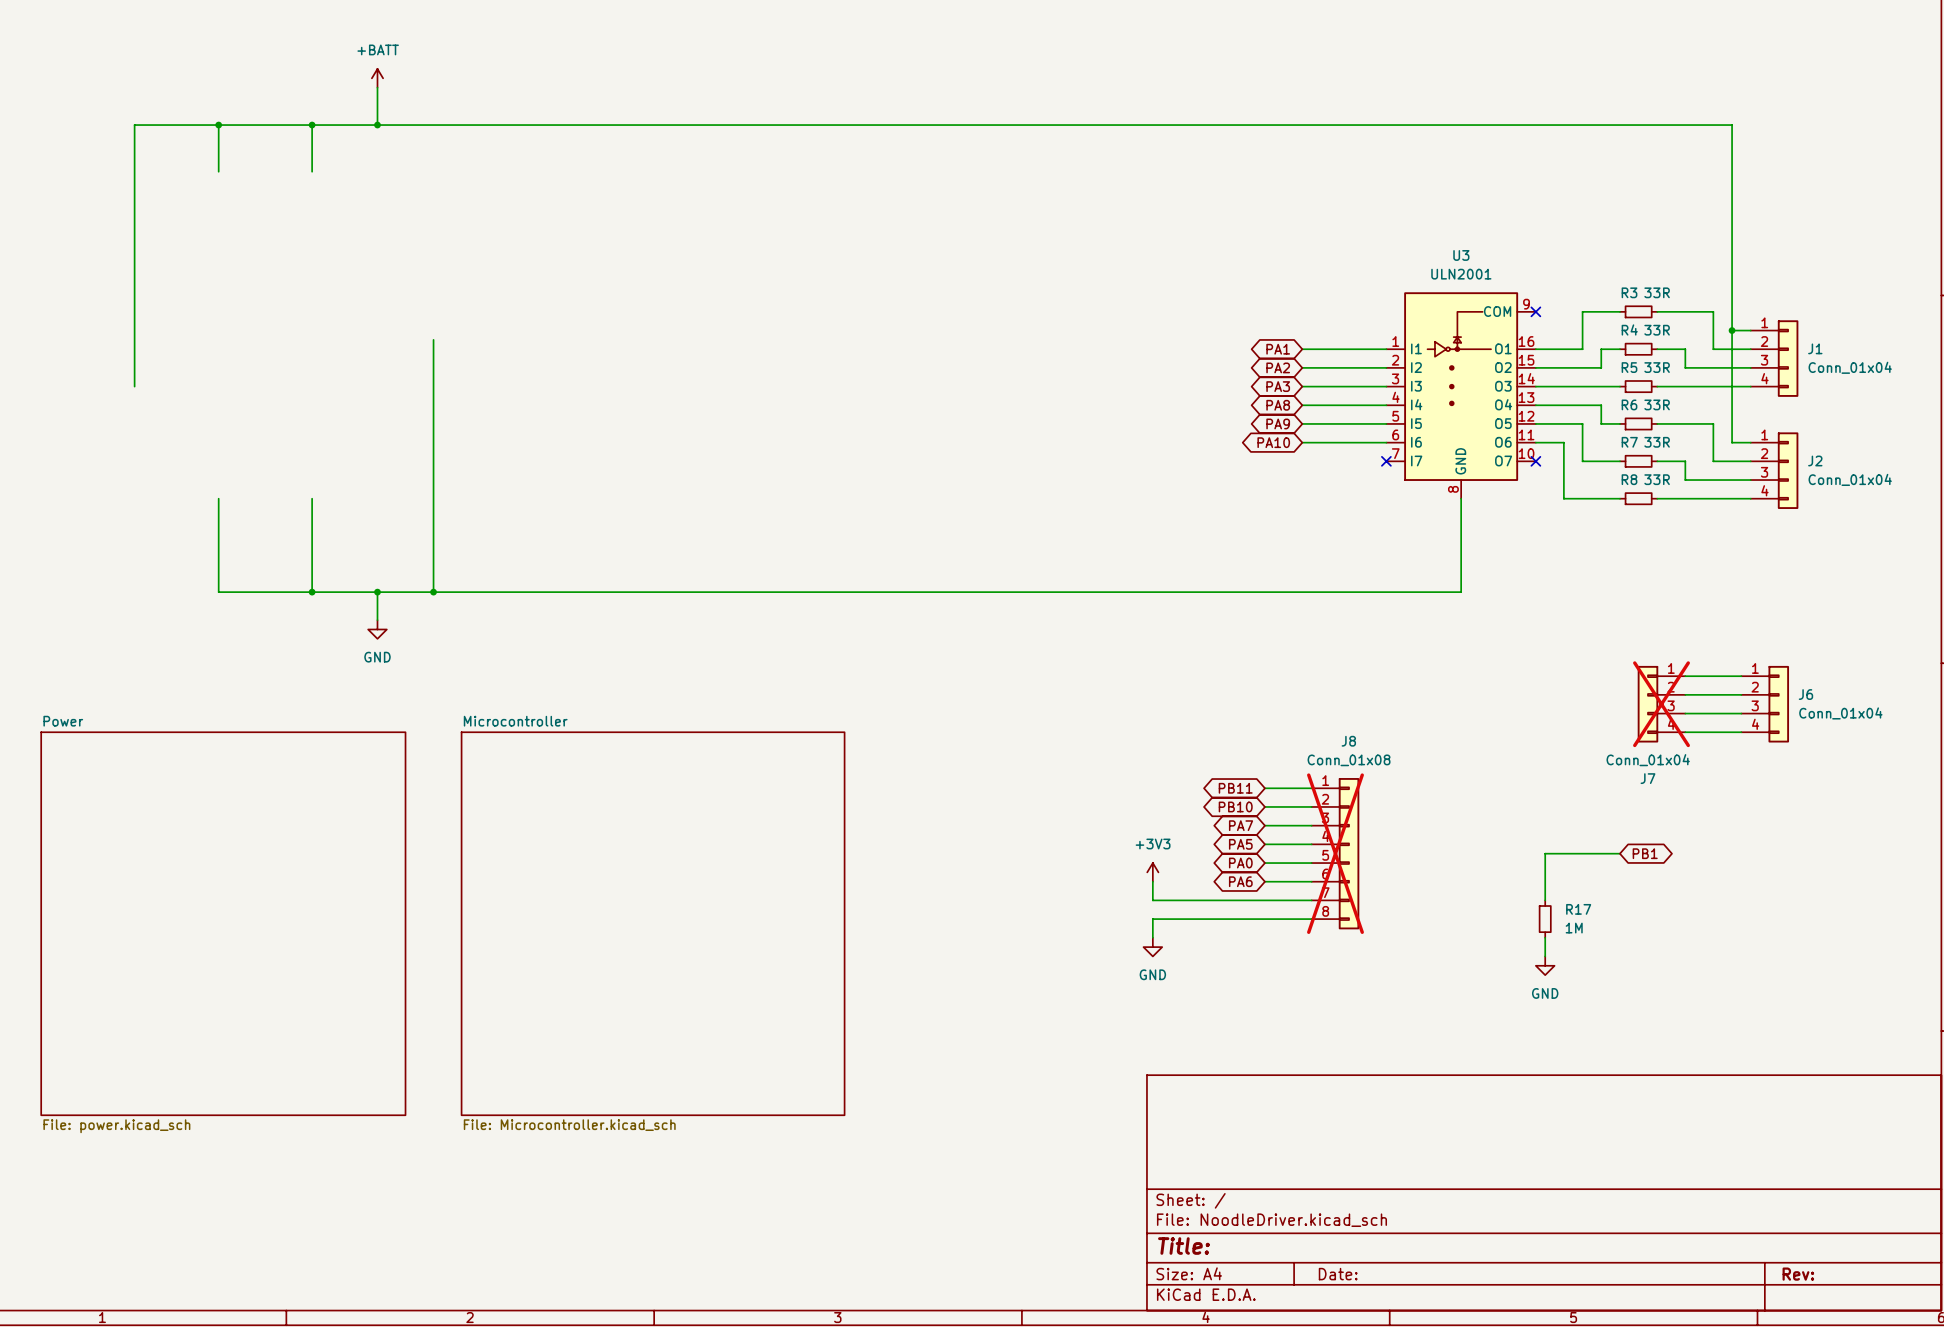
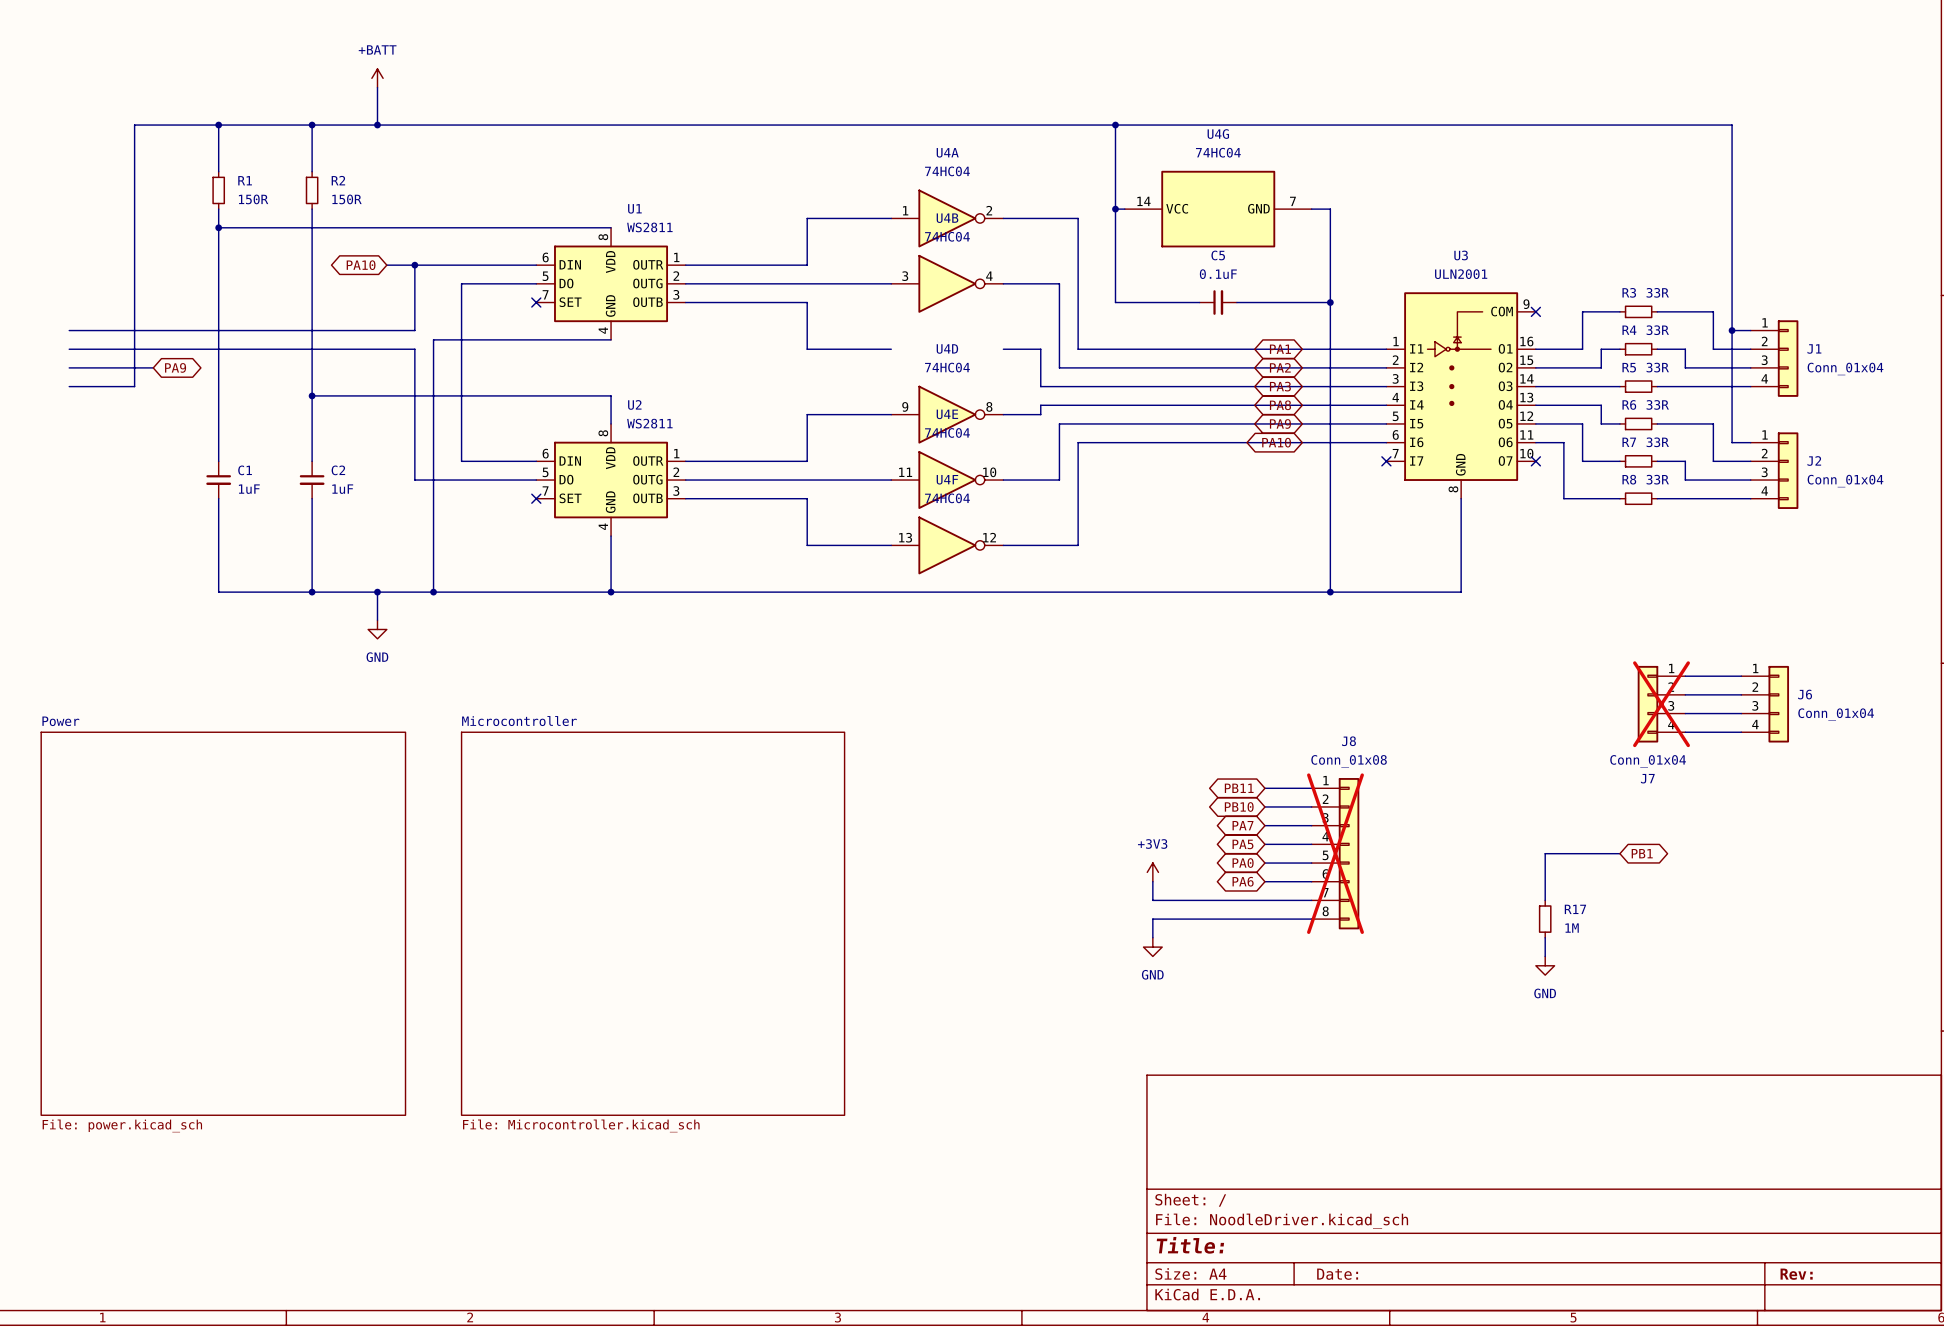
wire: none -> (1115, 125) (1115, 302) (1199, 302)
junction: none -> (1115, 125)
R1: none -> 150R (218, 190)
R2: none -> 150R (312, 190)
wire: none -> (218, 209) (218, 461)
wire: none -> (312, 209) (312, 461)
wire: none -> (1115, 209) (1124, 209)
junction: none -> (1115, 209)
U4G: none -> 74HC04 (1218, 209)
wire: none -> (1311, 209) (1330, 209) (1330, 592)
wire: none -> (891, 218) (807, 218) (807, 265) (685, 265)
U4A: none -> 74HC04 (947, 218)
wire: none -> (1003, 218) (1078, 218) (1078, 349) (1302, 349)
wire: none -> (218, 227) (611, 227)
junction: none -> (218, 227)
global label: none -> PA10 (361, 265)
wire: none -> (386, 265) (536, 265)
wire: none -> (414, 265) (414, 330) (69, 330)
junction: none -> (414, 265)
wire: none -> (536, 283) (461, 283) (461, 461) (536, 461)
U1: none -> WS2811 (611, 283)
wire: none -> (685, 283) (891, 283)
U4B: none -> 74HC04 (947, 283)
wire: none -> (1003, 283) (1059, 283) (1059, 367) (1302, 367)
no-connect mark: none -> (536, 302)
wire: none -> (685, 302) (807, 302) (807, 349) (891, 349)
C5: none -> 0.1uF (1218, 302)
wire: none -> (1236, 302) (1330, 302)
junction: none -> (1330, 302)
wire: none -> (433, 339) (611, 339)
wire: none -> (69, 349) (414, 349) (414, 480) (536, 480)
wire: none -> (1003, 349) (1040, 349) (1040, 386) (1302, 386)
wire: none -> (69, 367) (153, 367)
global label: none -> PA9 (175, 367)
wire: none -> (69, 386) (134, 386)
wire: none -> (312, 395) (611, 395) (611, 423)
junction: none -> (312, 395)
wire: none -> (1302, 405) (1040, 405) (1040, 414) (1003, 414)
wire: none -> (891, 414) (807, 414) (807, 461) (685, 461)
U4D: none -> 74HC04 (947, 414)
wire: none -> (1302, 423) (1059, 423) (1059, 480) (1003, 480)
wire: none -> (1302, 442) (1078, 442) (1078, 545) (1003, 545)
C1: none -> 1uF (218, 480)
C2: none -> 1uF (312, 480)
U2: none -> WS2811 (611, 480)
wire: none -> (685, 480) (891, 480)
U4E: none -> 74HC04 (947, 480)
no-connect mark: none -> (536, 498)
wire: none -> (685, 498) (807, 498) (807, 545) (891, 545)
wire: none -> (611, 536) (611, 592)
U4F: none -> 74HC04 (947, 545)
junction: none -> (611, 592)
junction: none -> (1330, 592)

